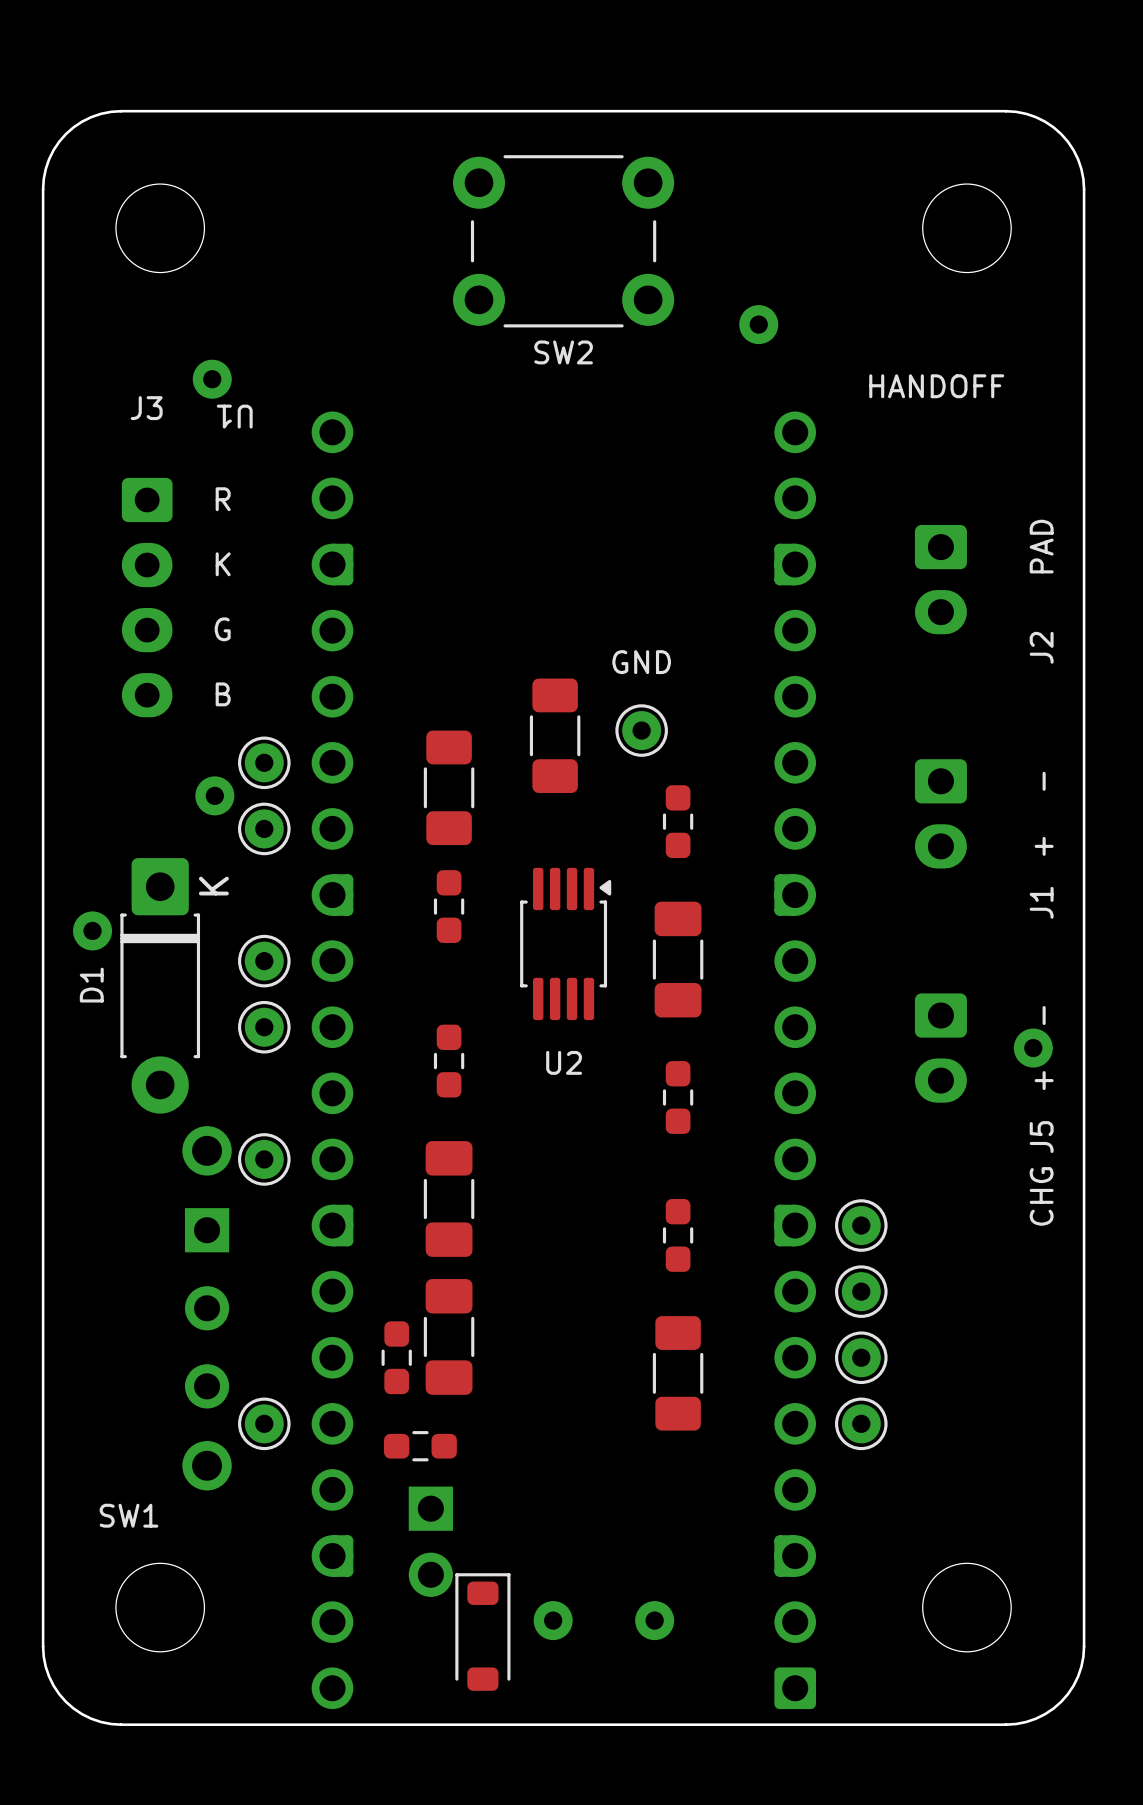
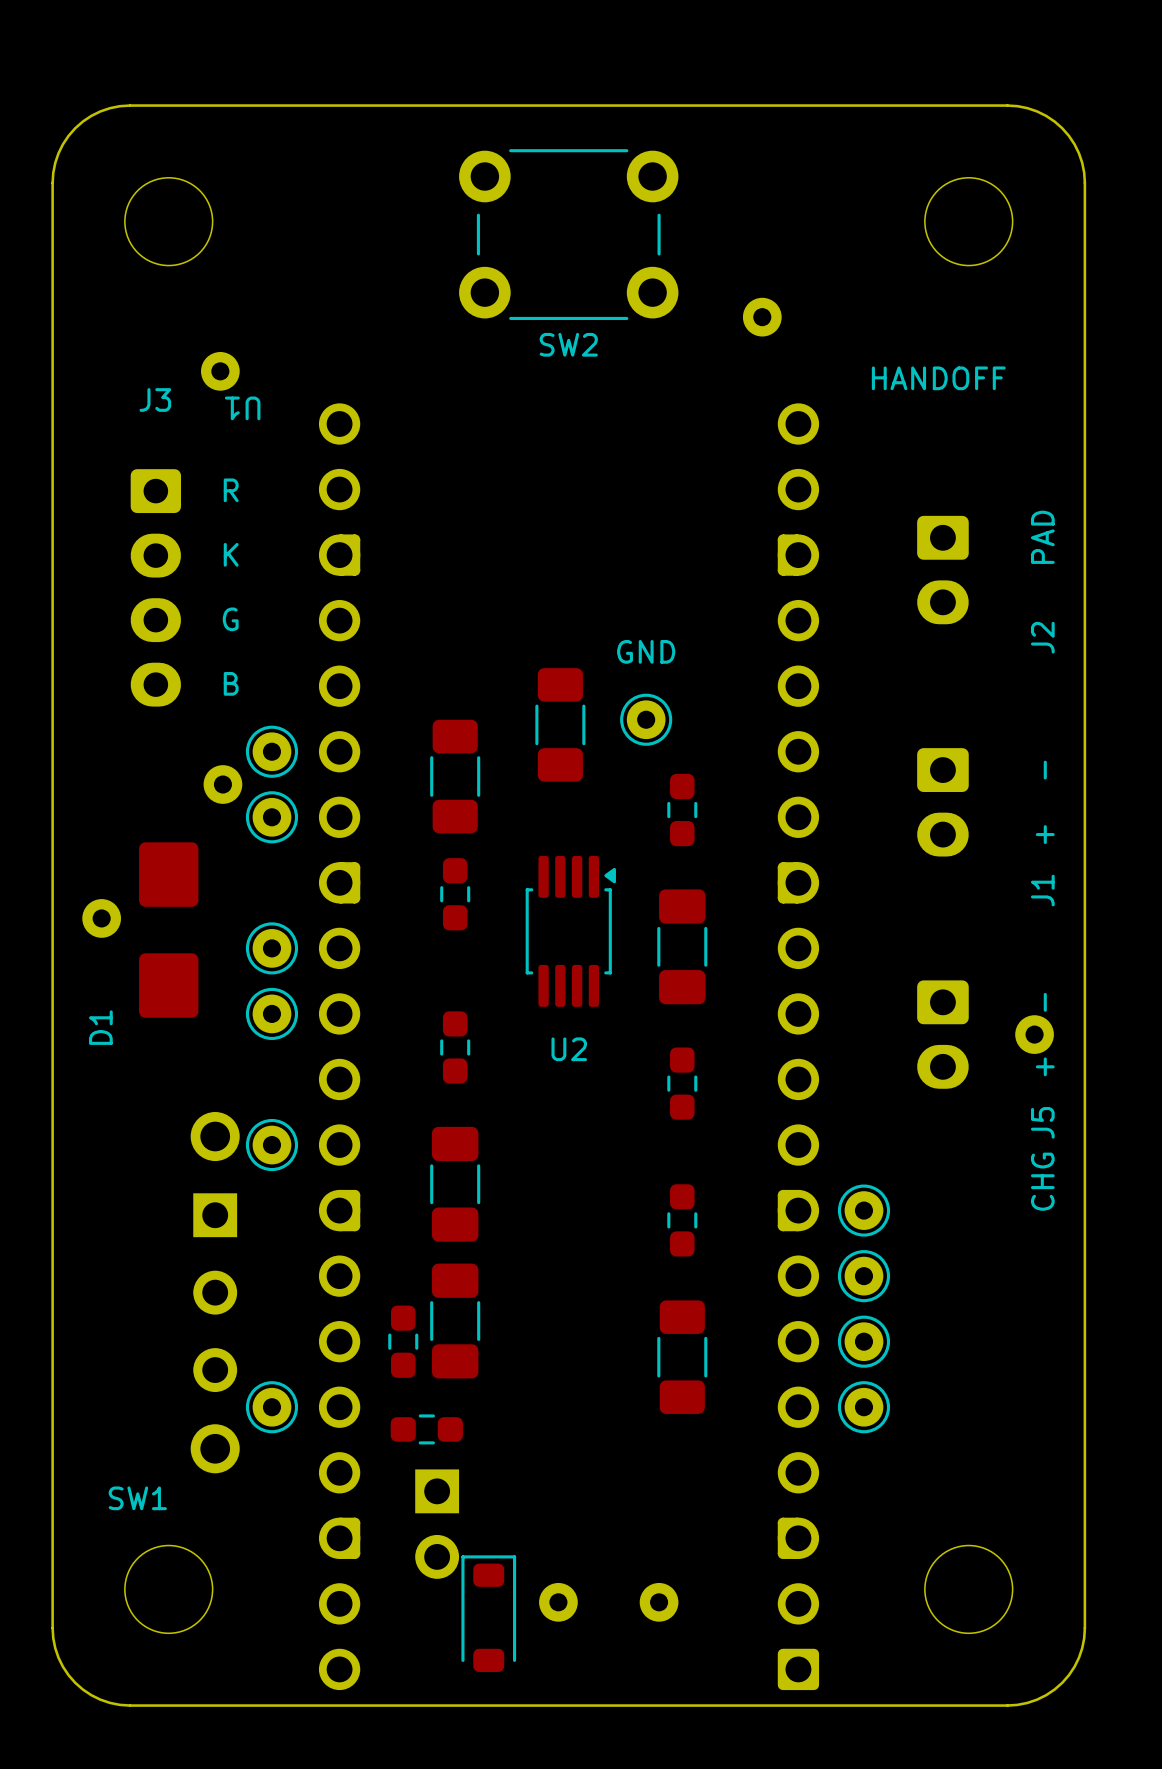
D1 footprint: [120, 858, 201, 1114] -> [139, 842, 199, 1018]
D1 name position: D1 (91, 985) -> D1 (100, 1027)

